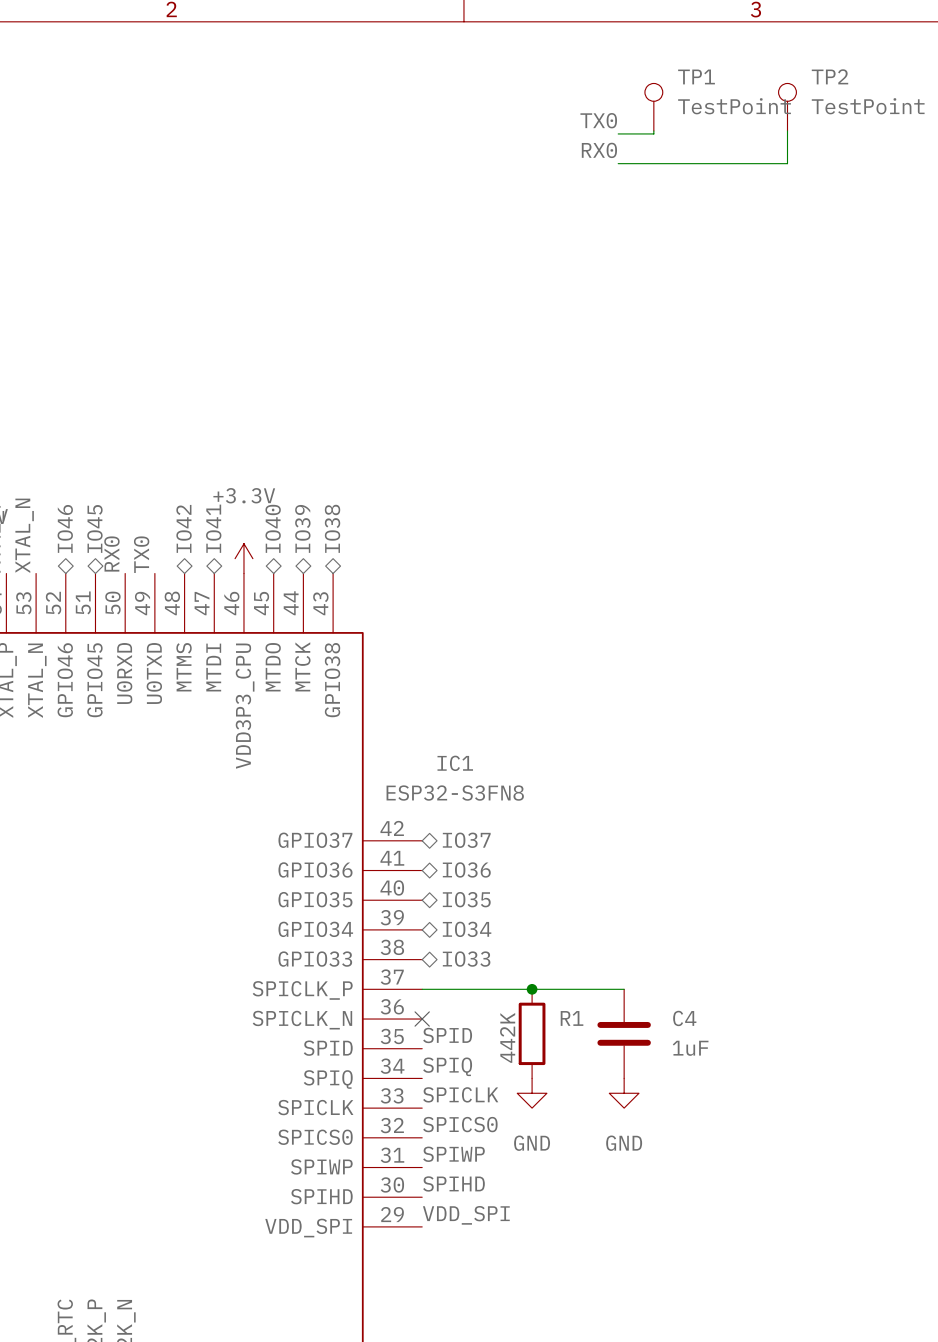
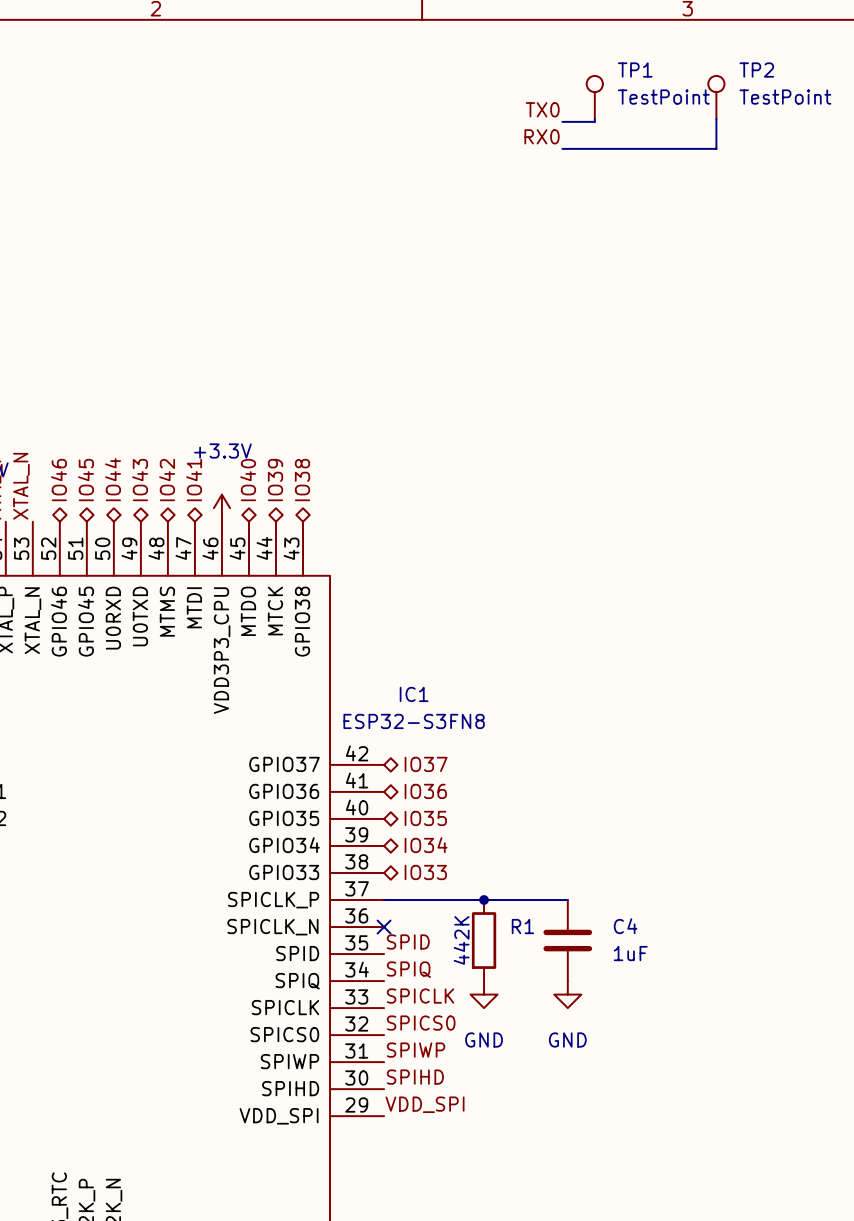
hierarchical label: none -> IO44 (113, 479)
hierarchical label: none -> IO43 (140, 480)
label: RX0 (111, 554) -> none
label: TX0 (141, 554) -> none

